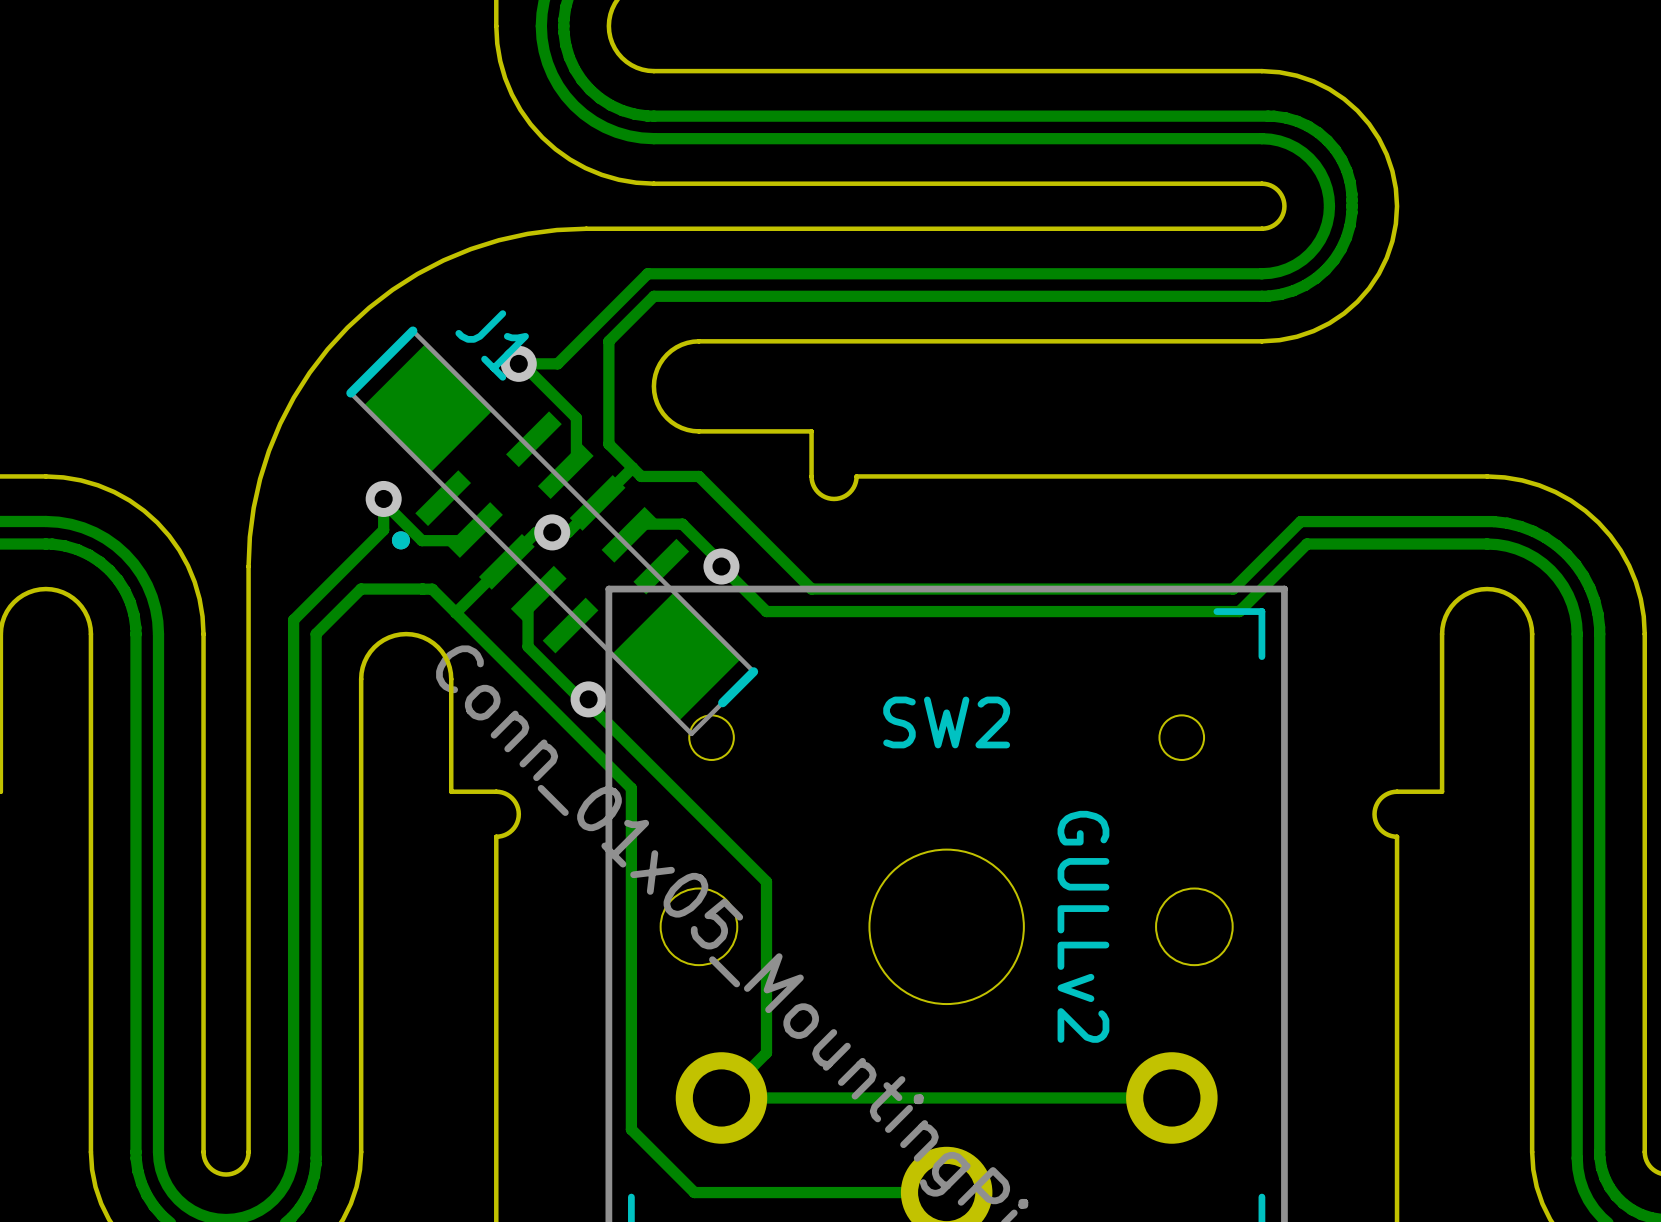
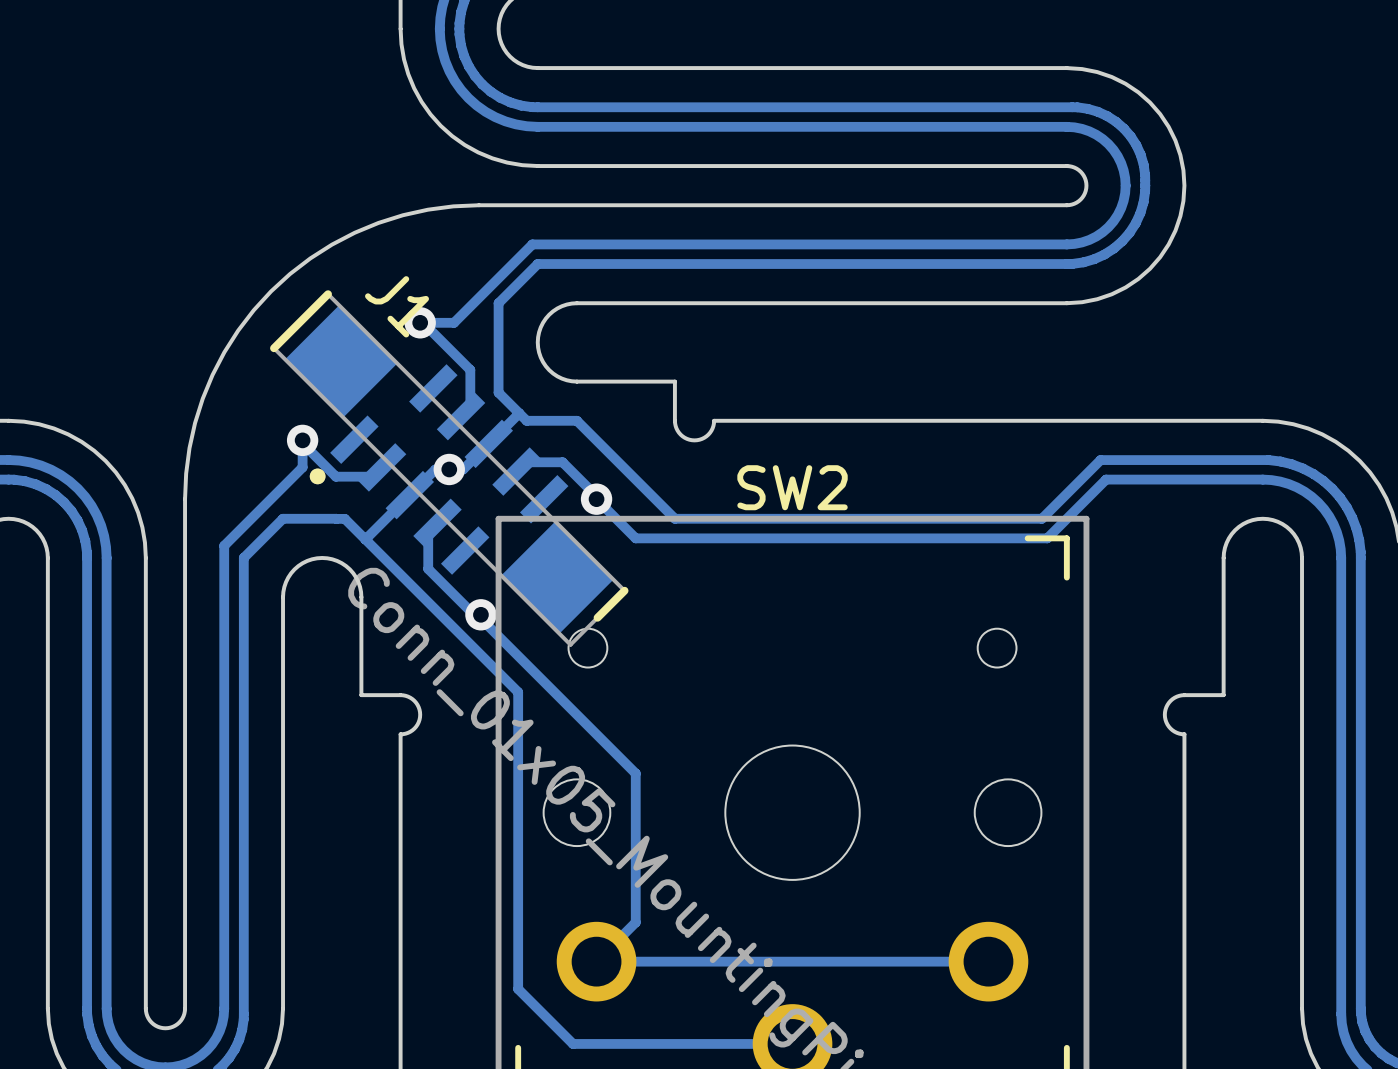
SW2 name position: SW2 (946, 722) -> SW2 (792, 487)
text: GULLv2 (1083, 926) -> none

